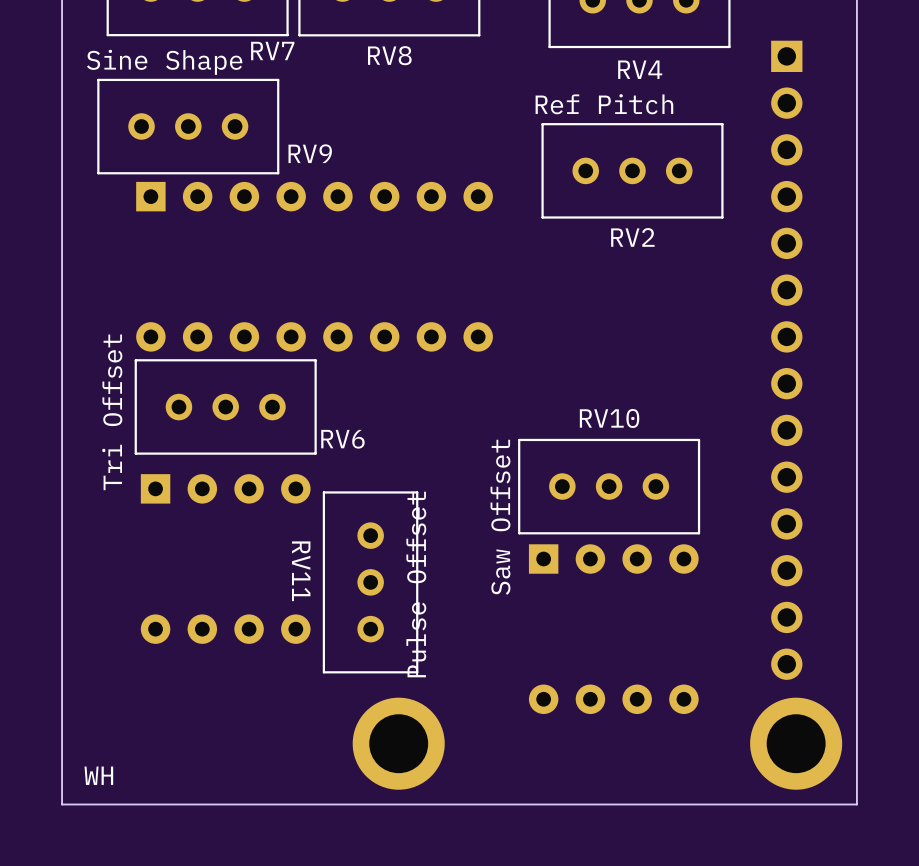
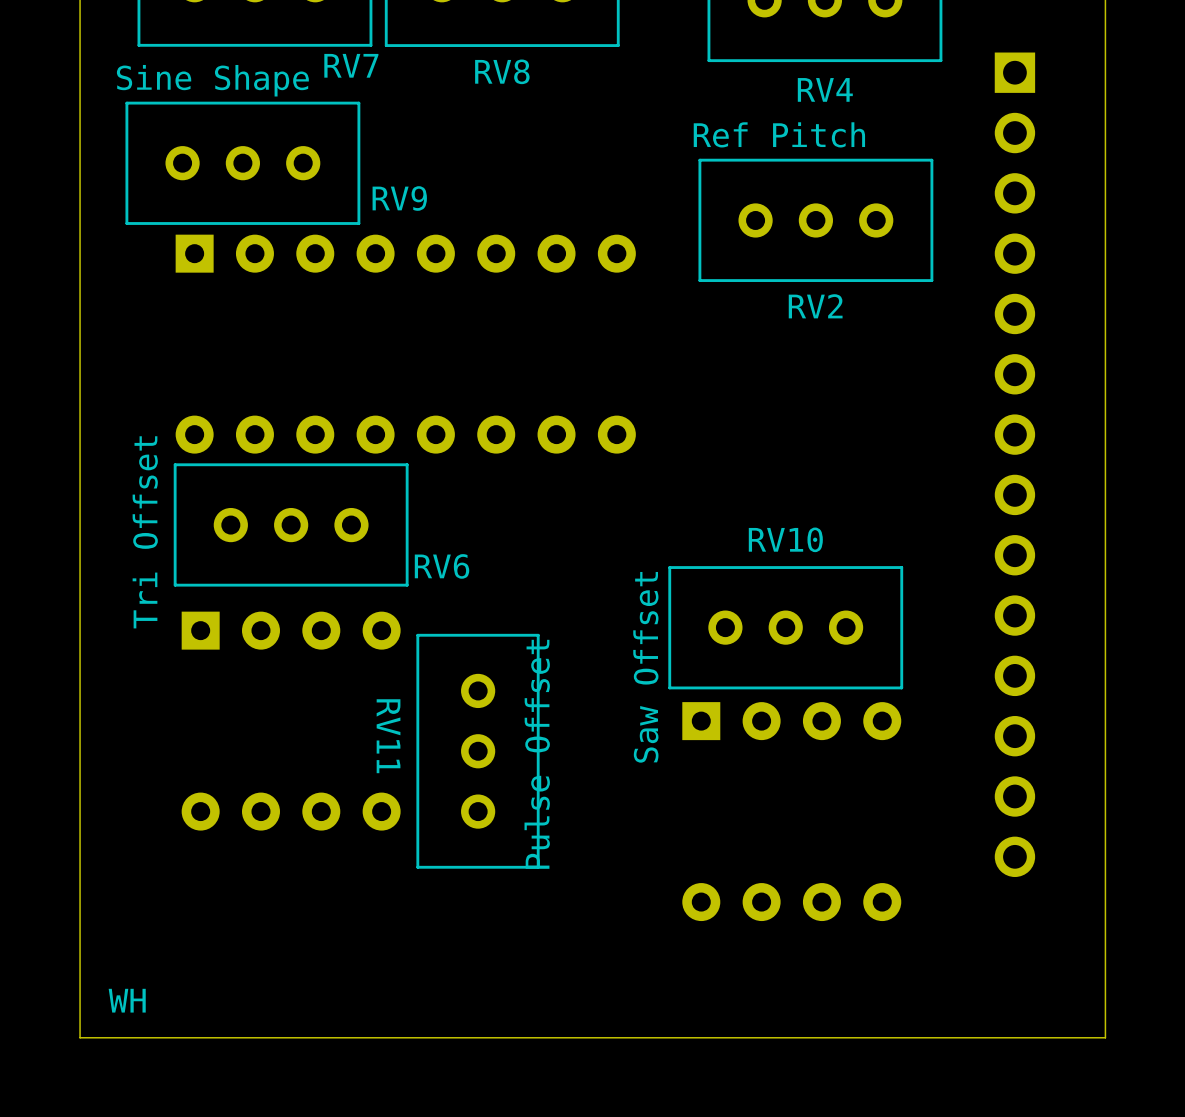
part: (398, 743) -> none
part: (796, 743) -> none

